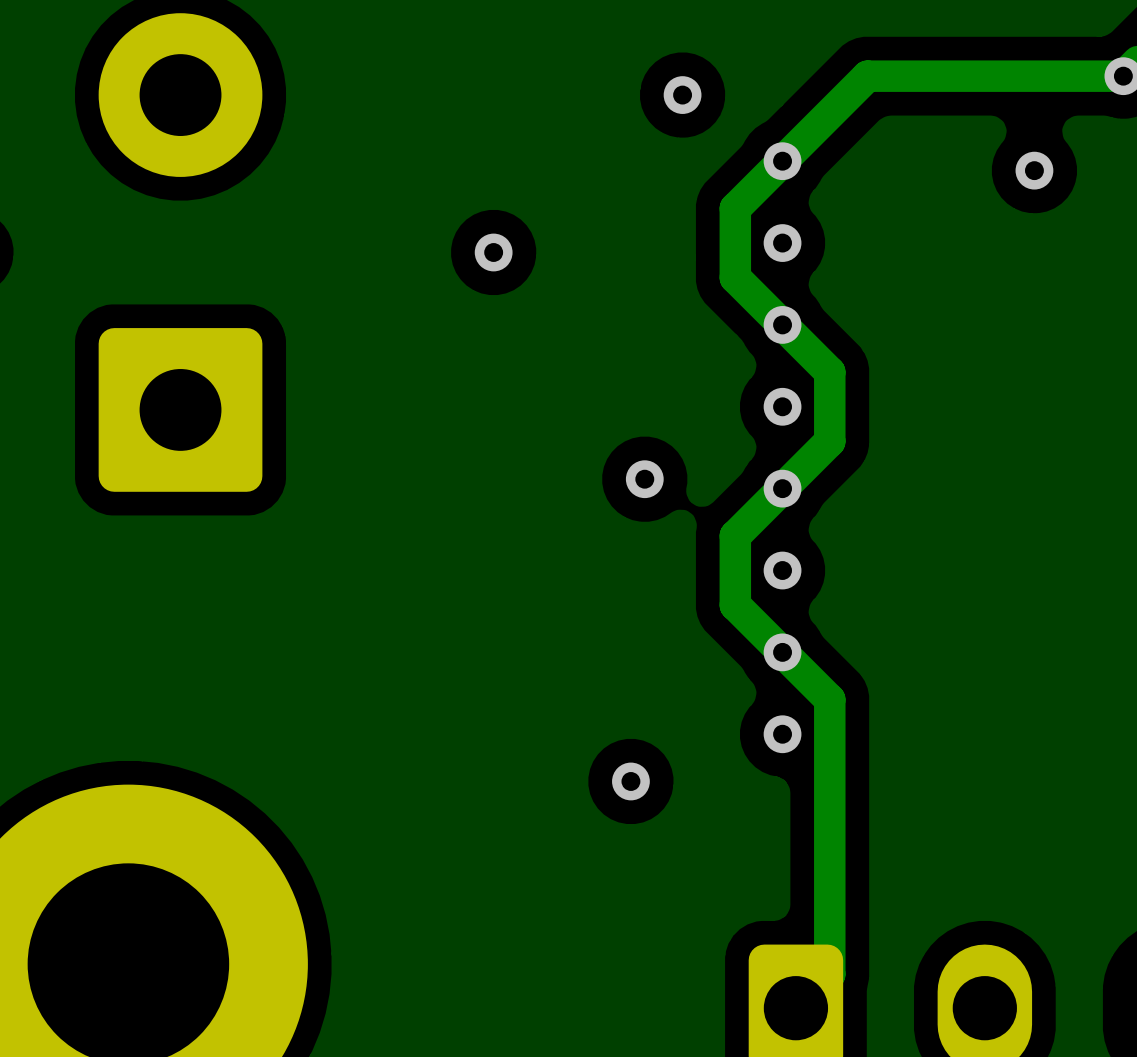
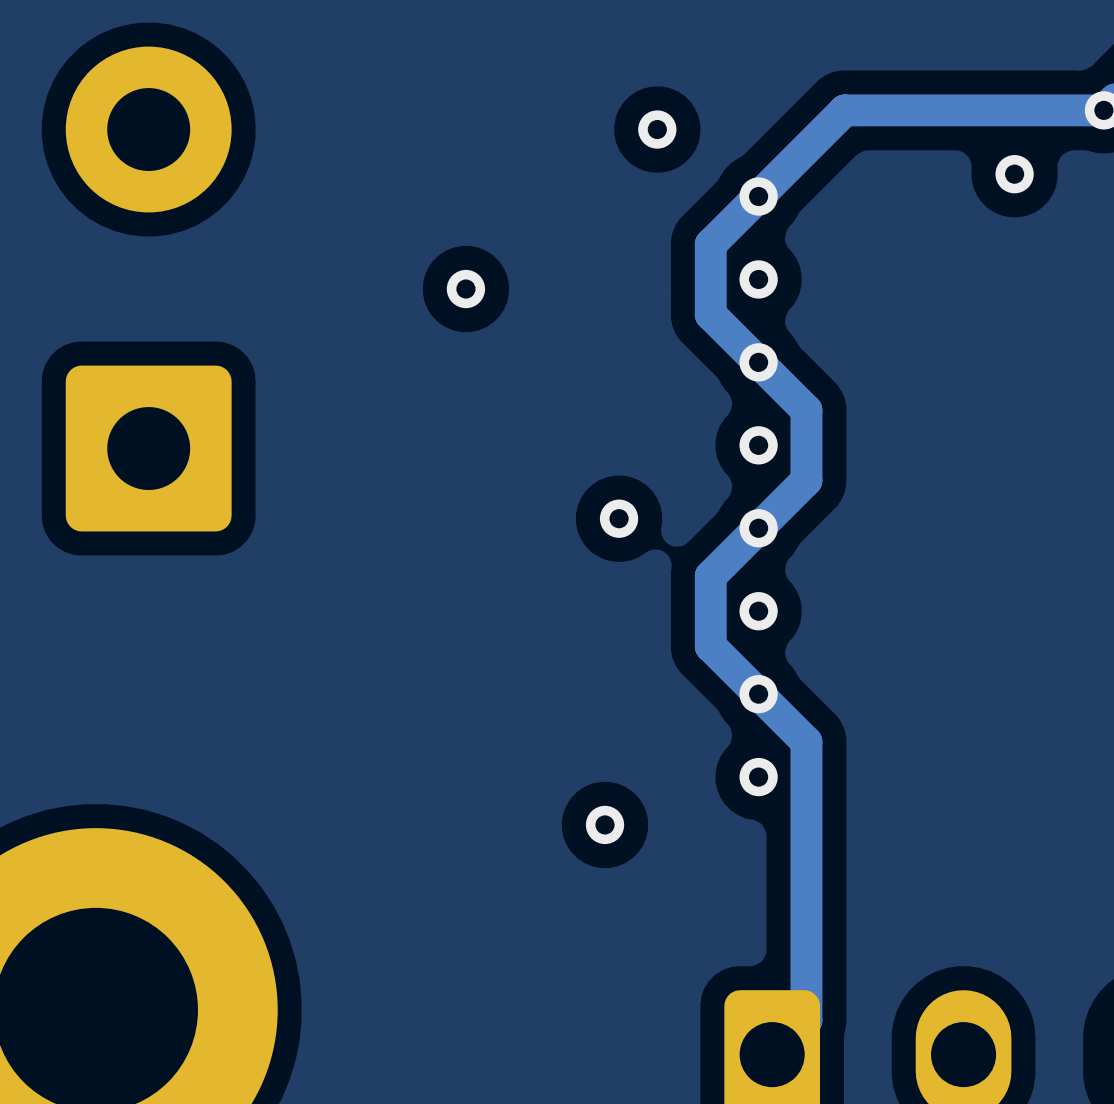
via position: (1034, 170) -> (1014, 174)

